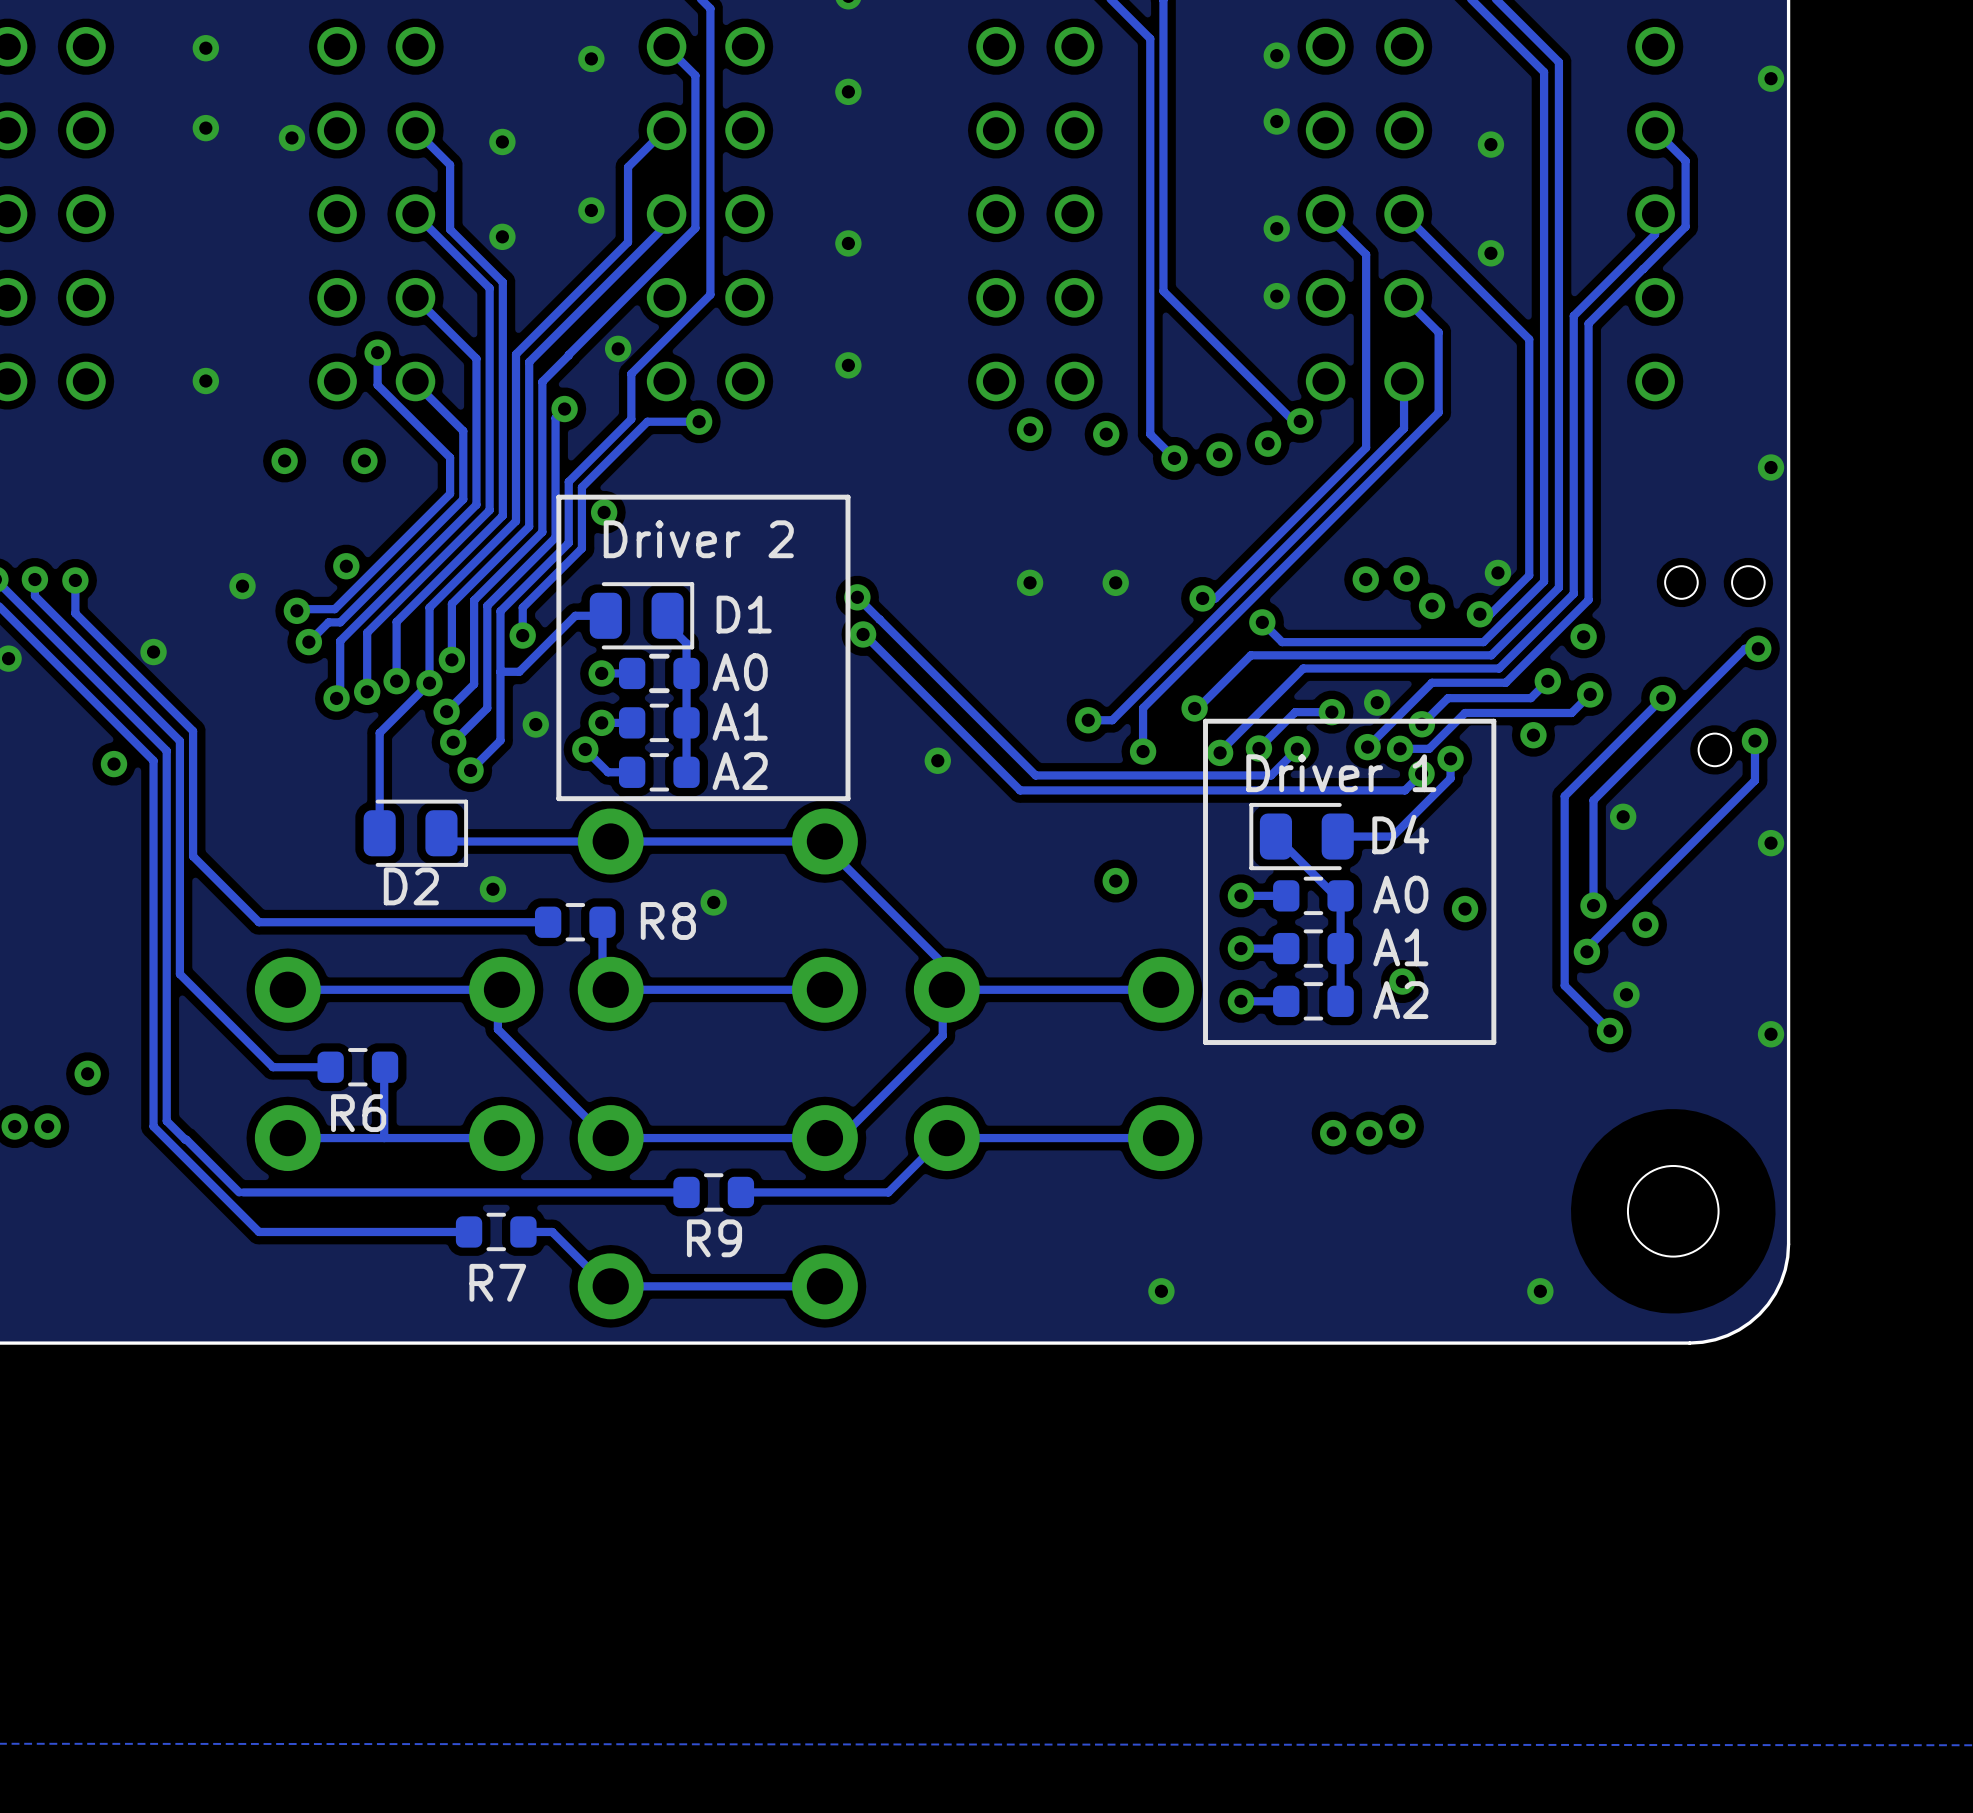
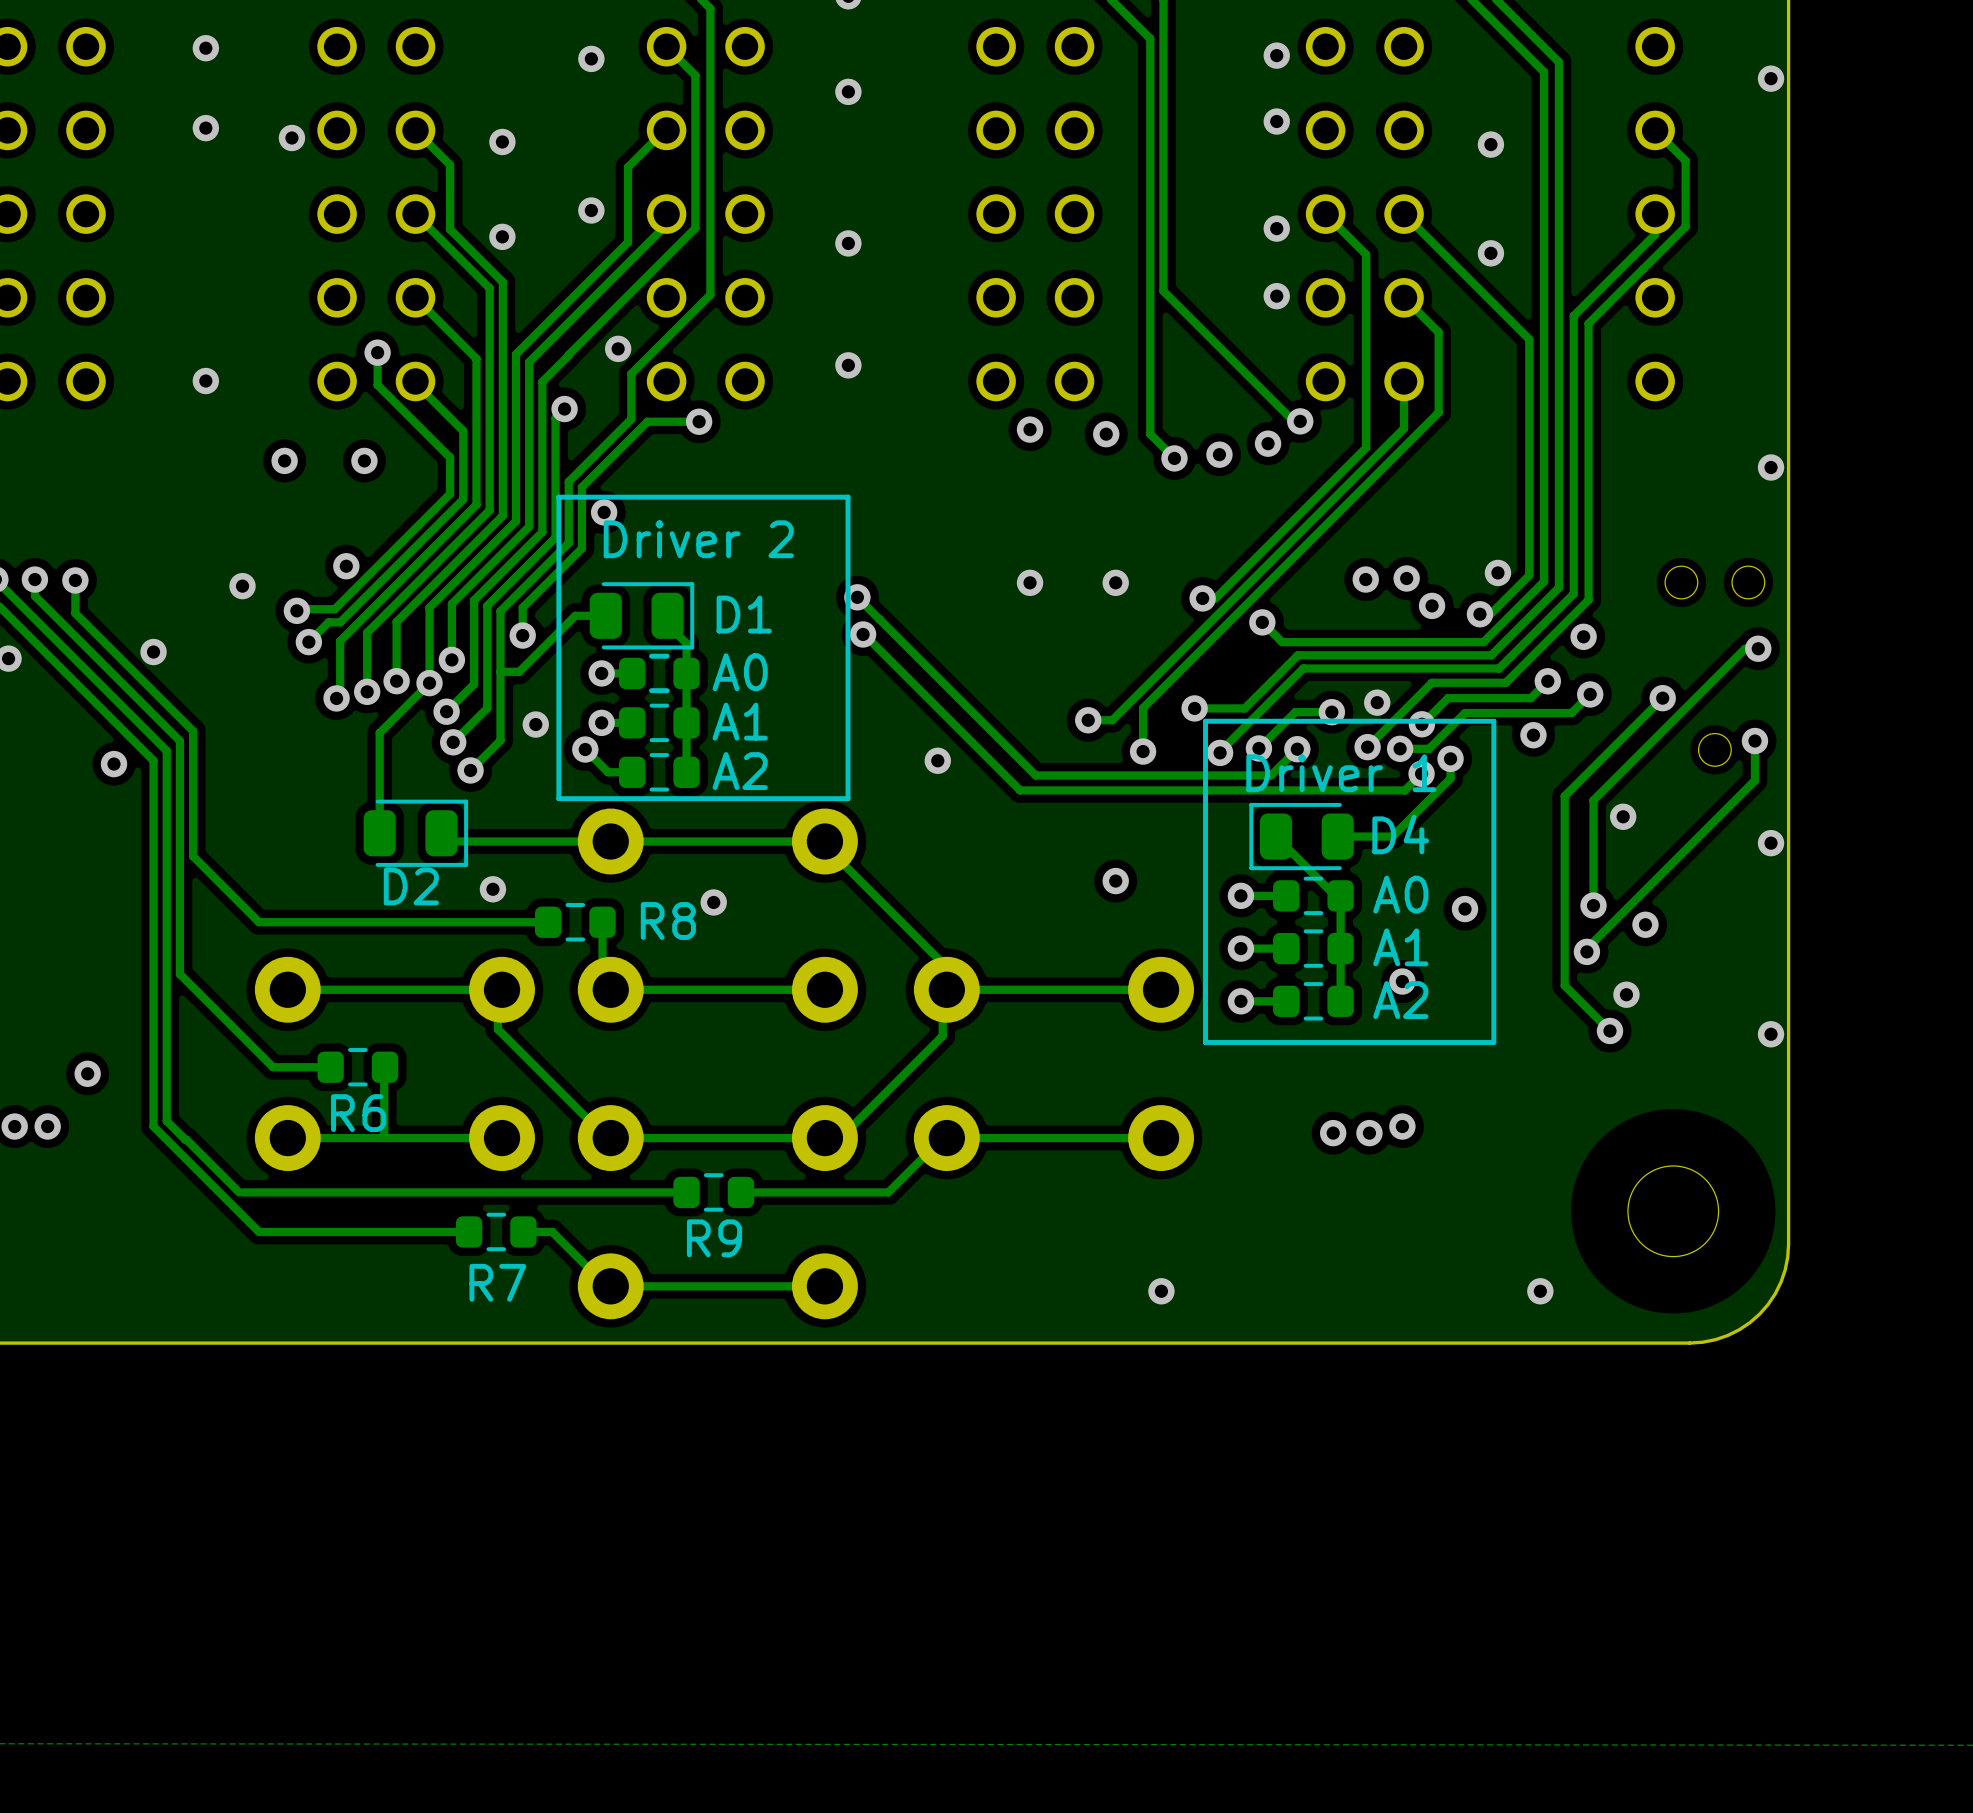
track: (1297, 655) (1250, 655) (1197, 708) -> (1297, 655) (1244, 708) (1197, 708)

